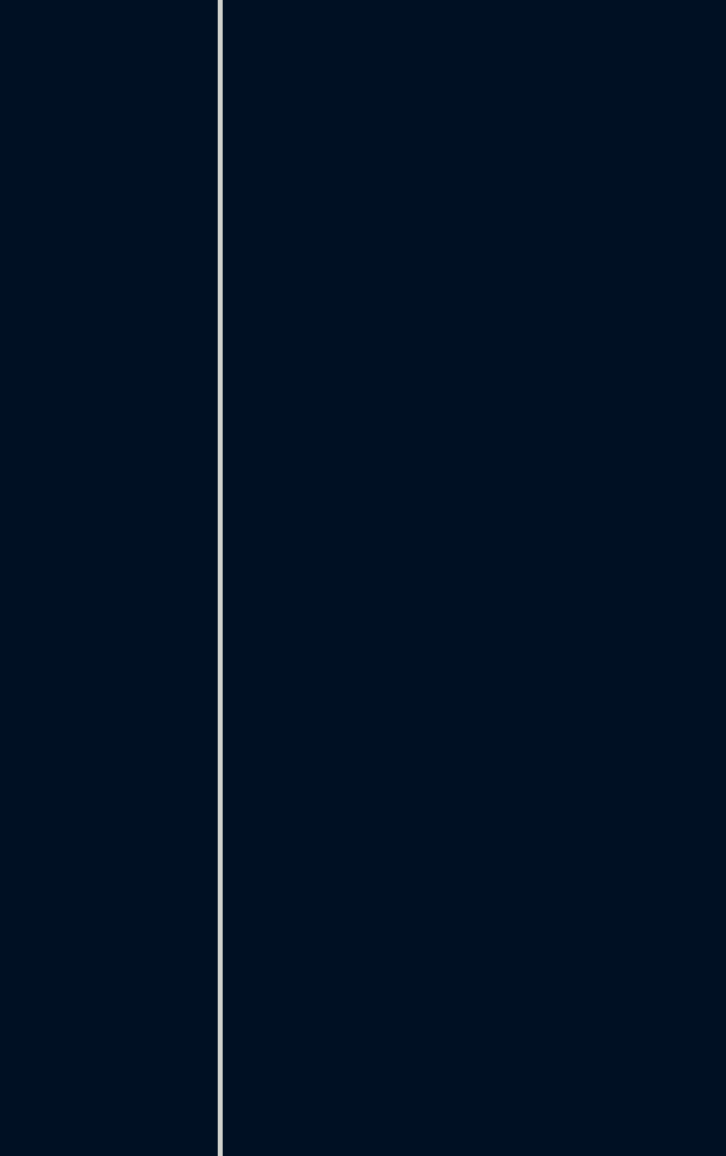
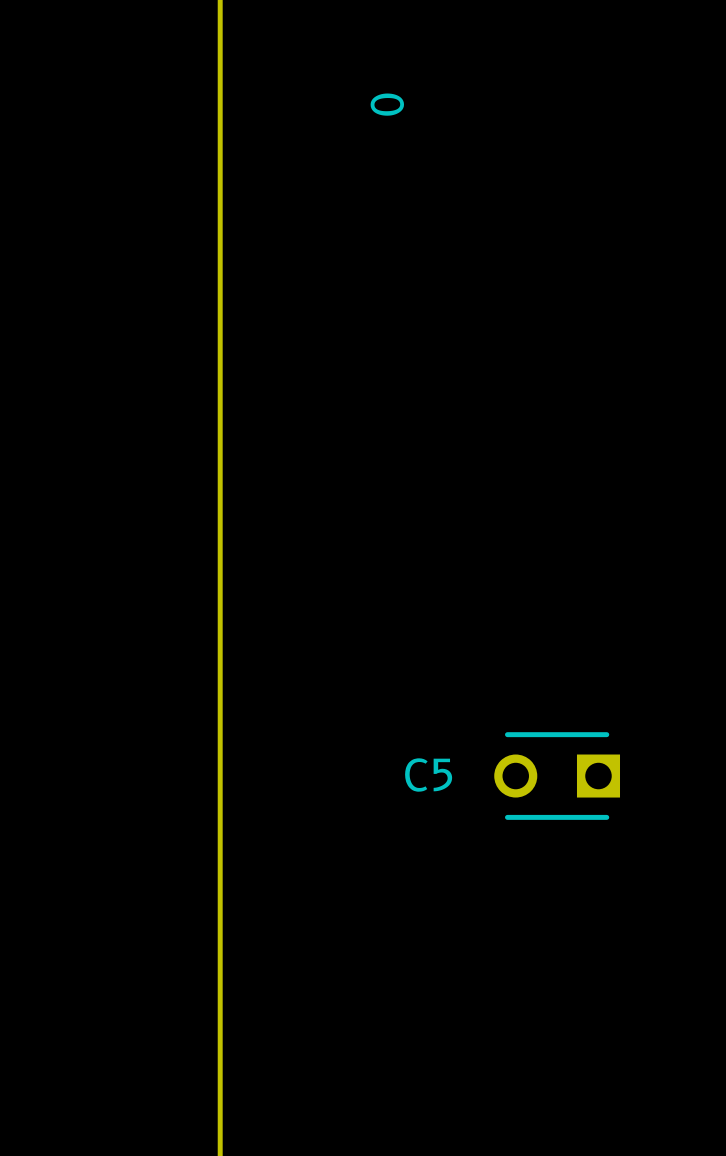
text: none -> 0 (387, 104)
C5: none -> (557, 776)

